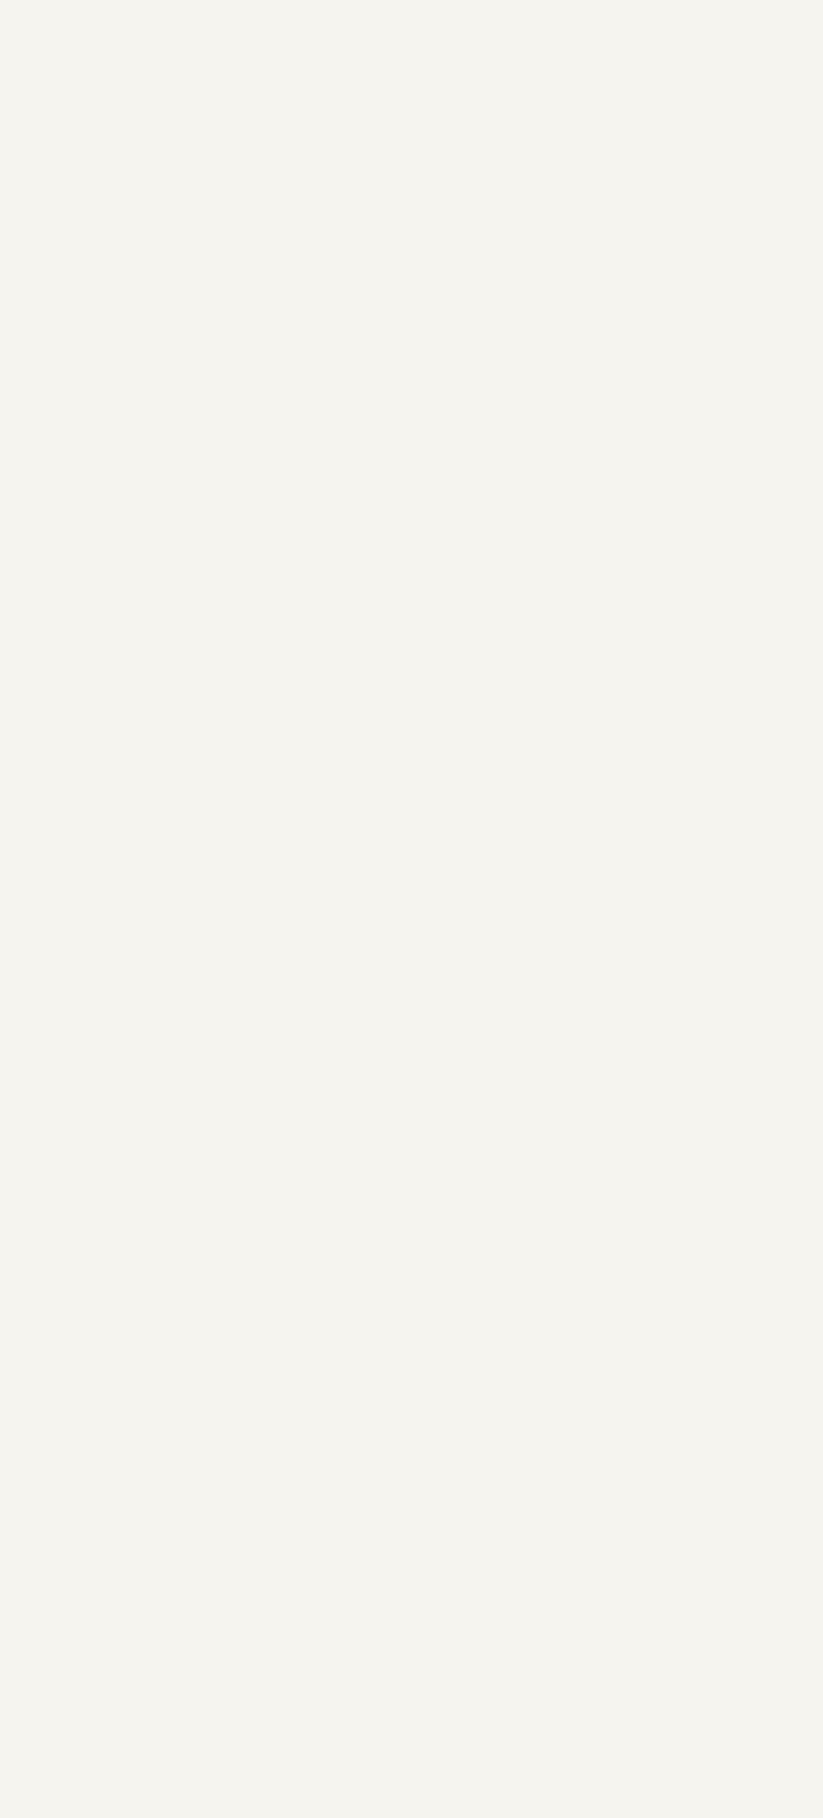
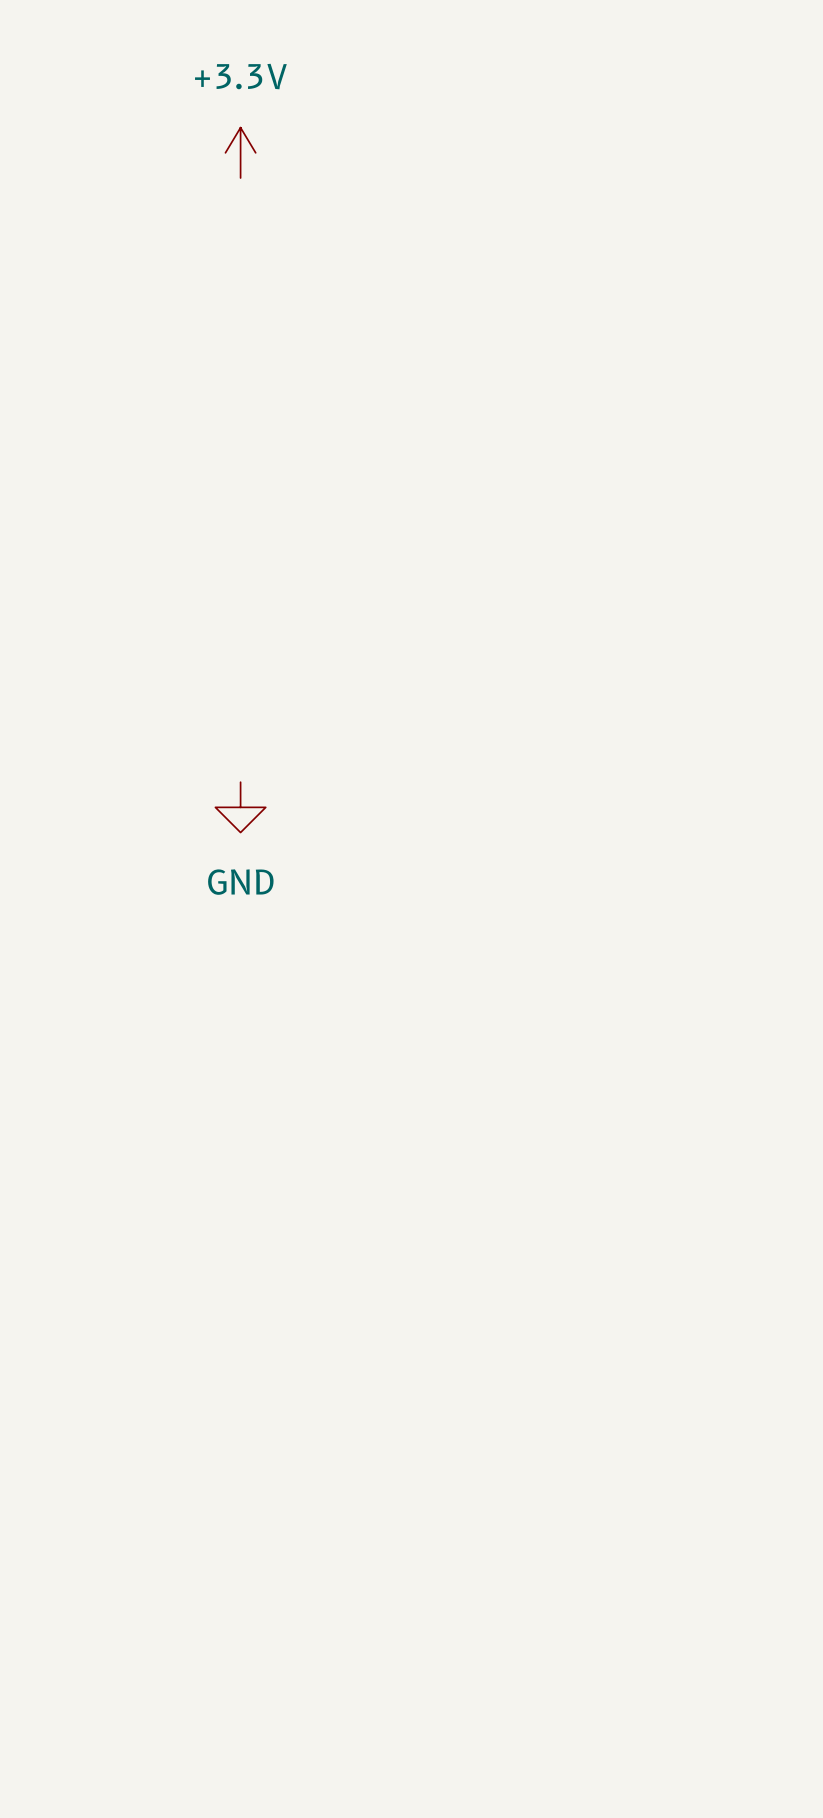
power symbol: none -> +3.3V (240, 152)
power symbol: none -> GND (240, 807)

